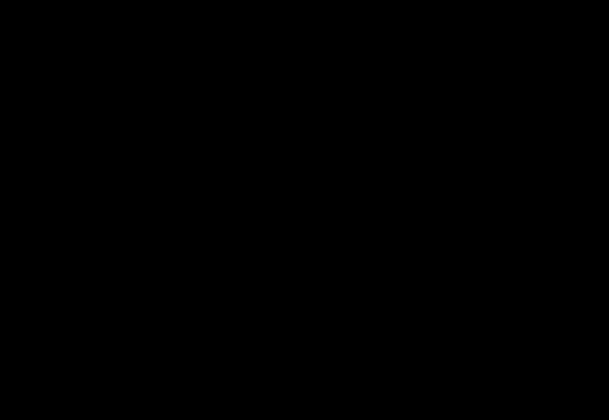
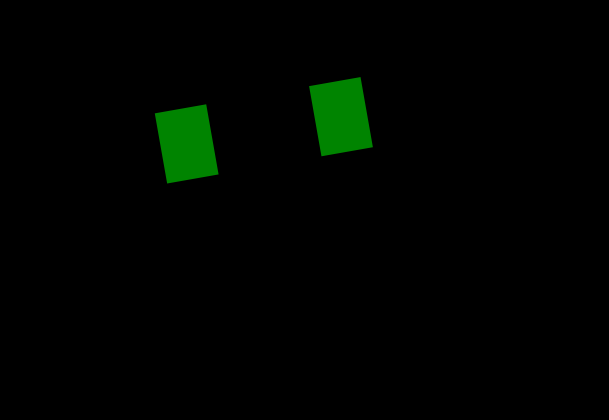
part: none -> (263, 130)

